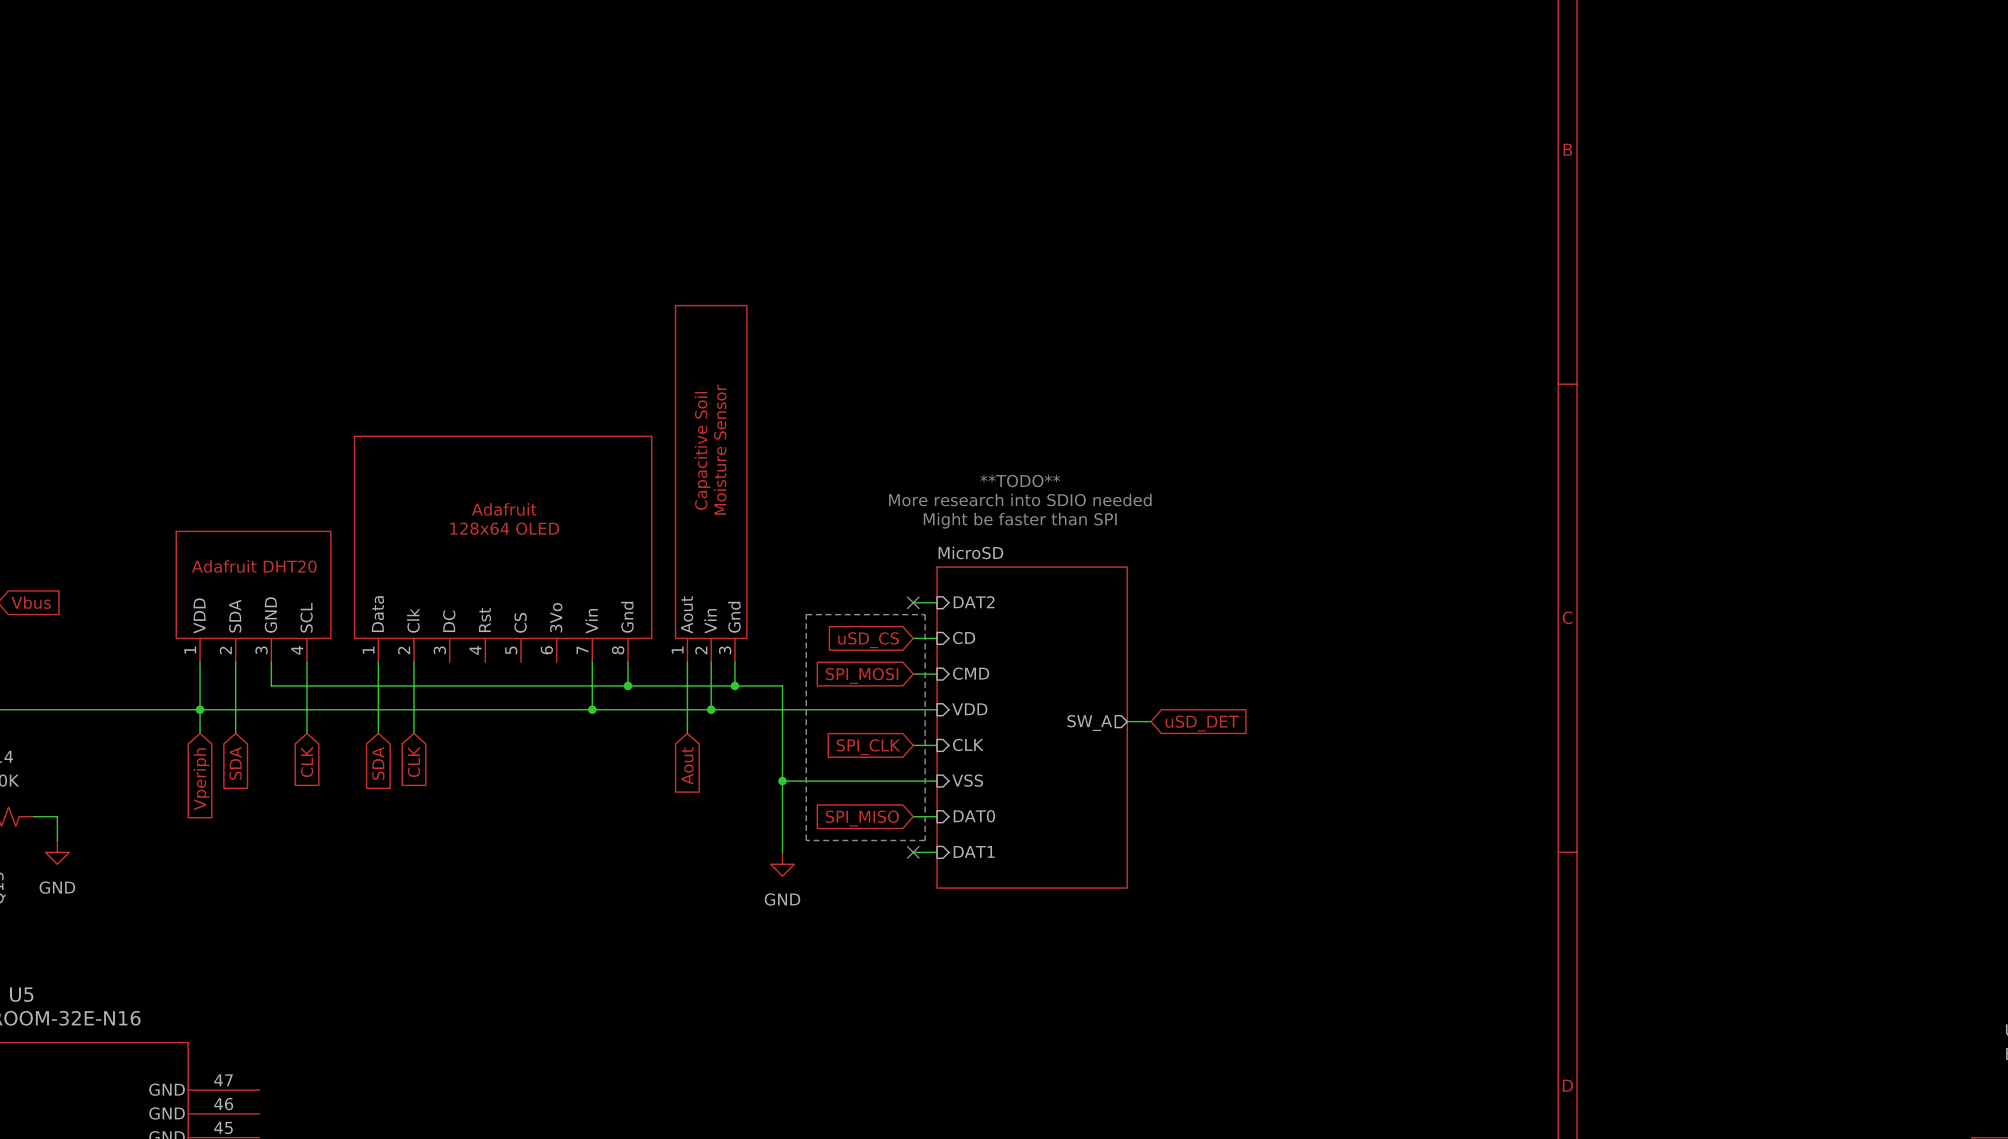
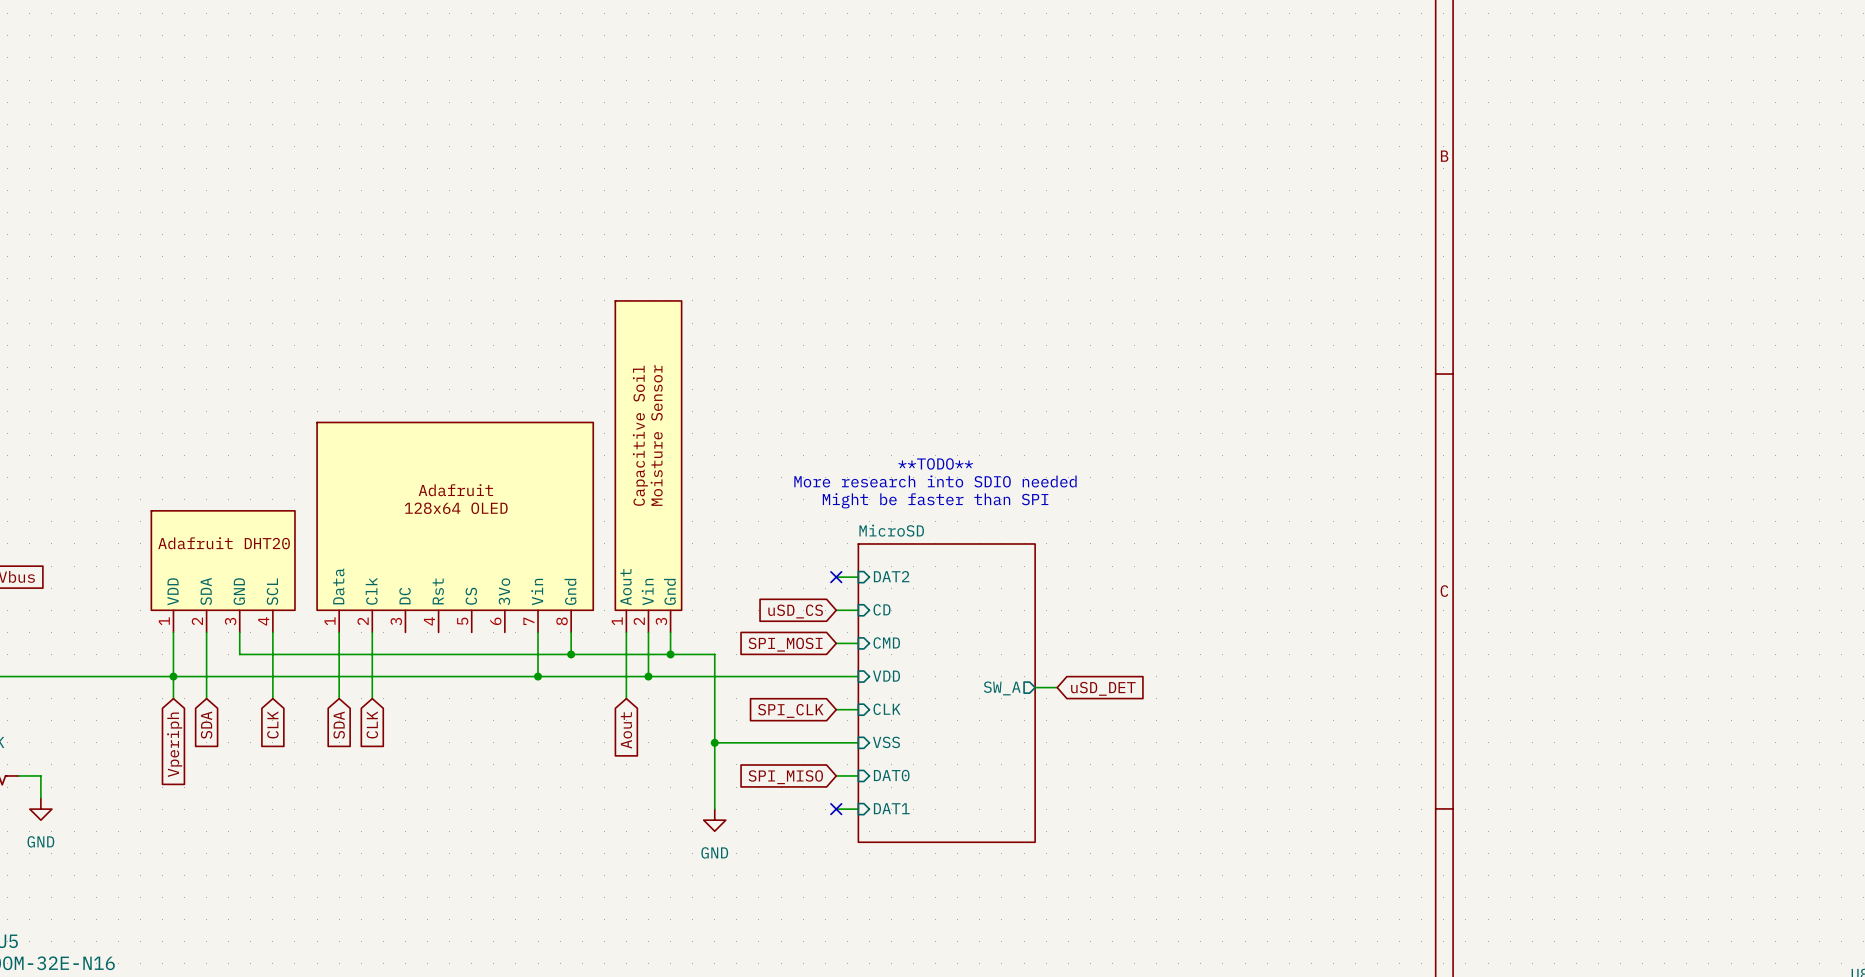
line: (806, 614) (925, 614) (925, 840) (806, 840) (806, 614) -> none

